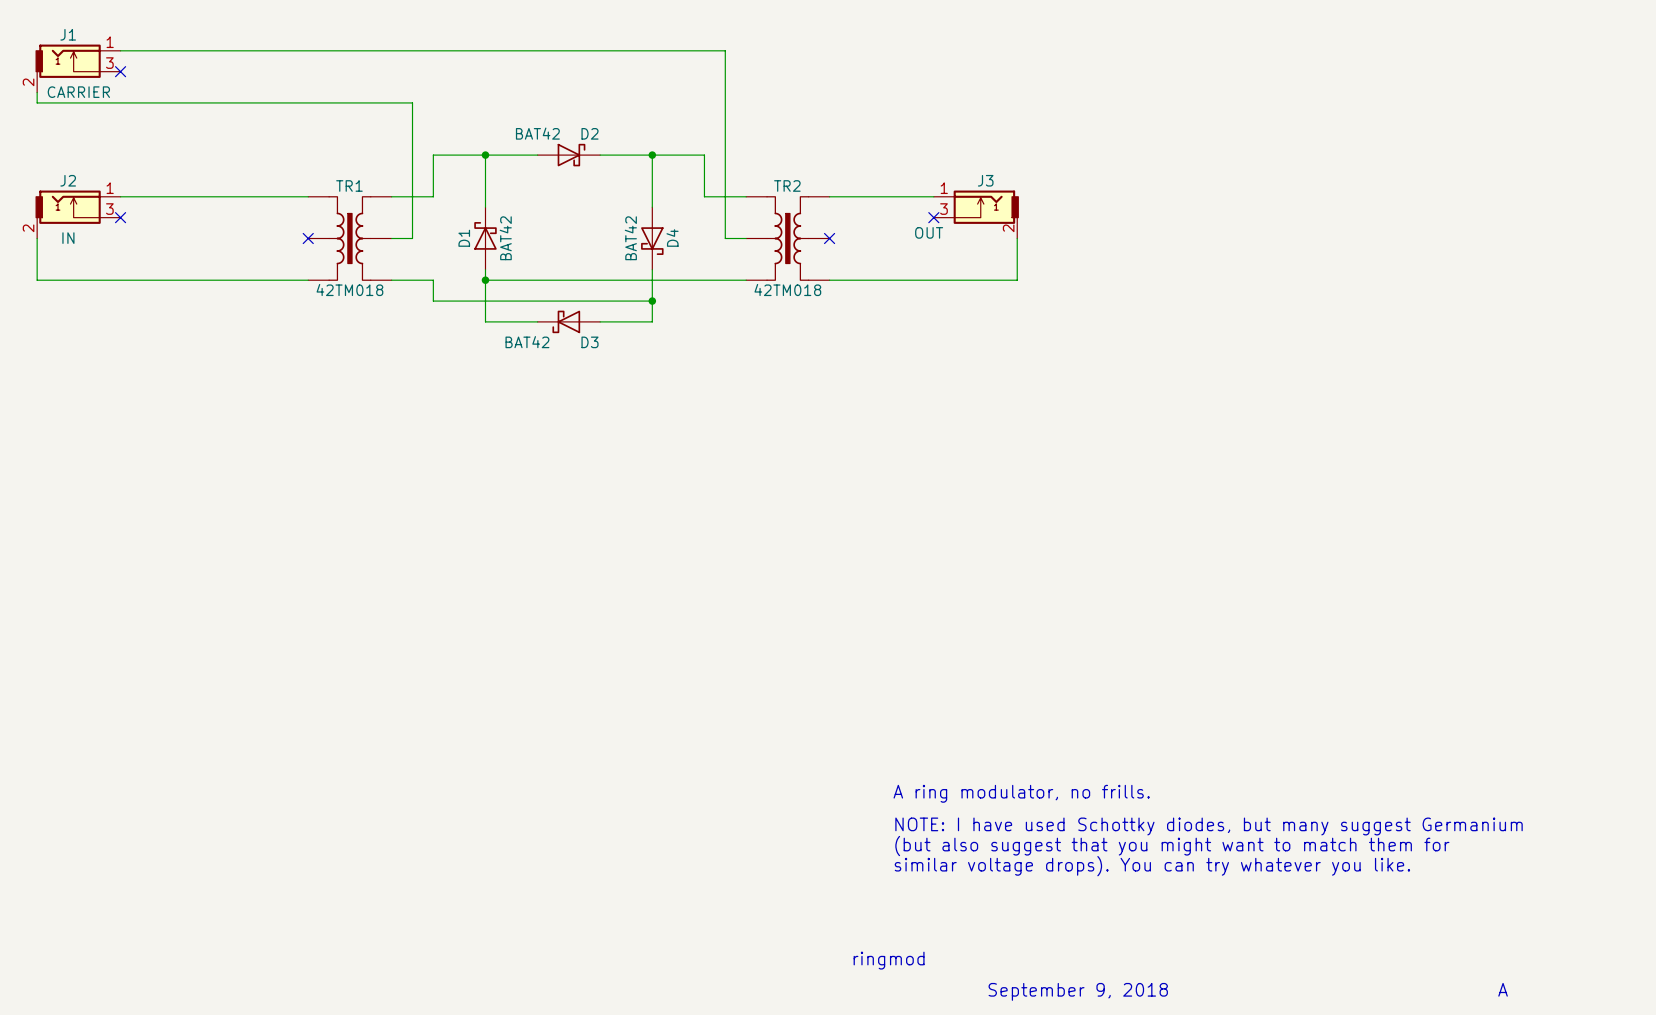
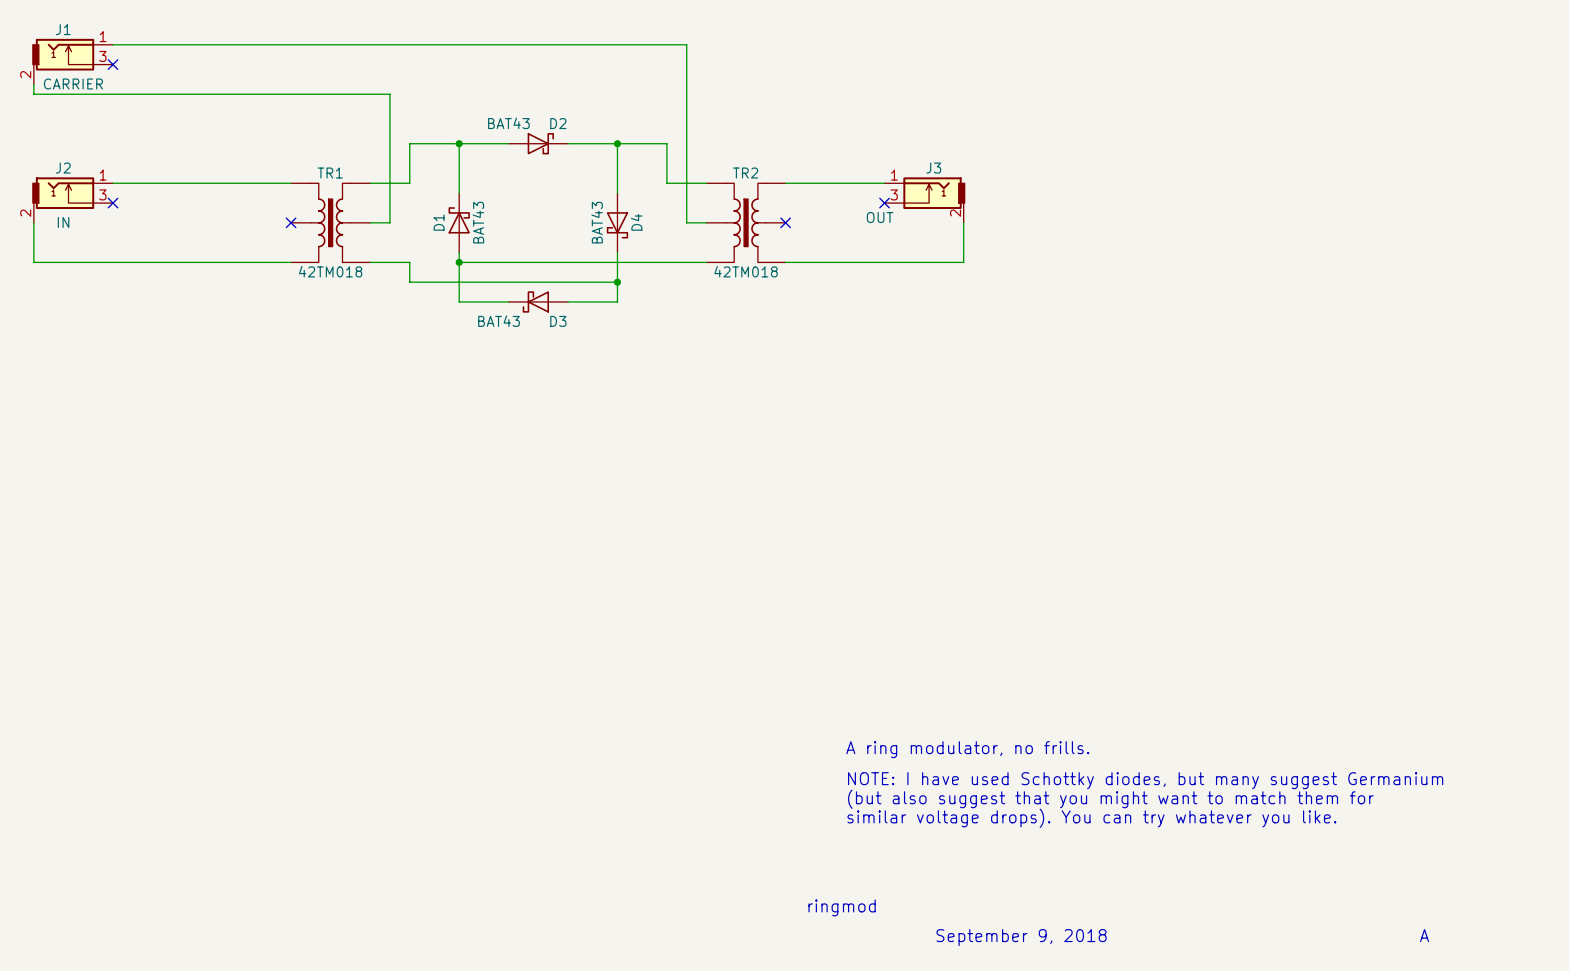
D2 value: BAT42 (537, 133) -> BAT43 (508, 123)
D1 value: BAT42 (505, 238) -> BAT43 (478, 222)
D4 value: BAT42 (630, 238) -> BAT43 (597, 222)
D3 value: BAT42 (527, 342) -> BAT43 (499, 321)

